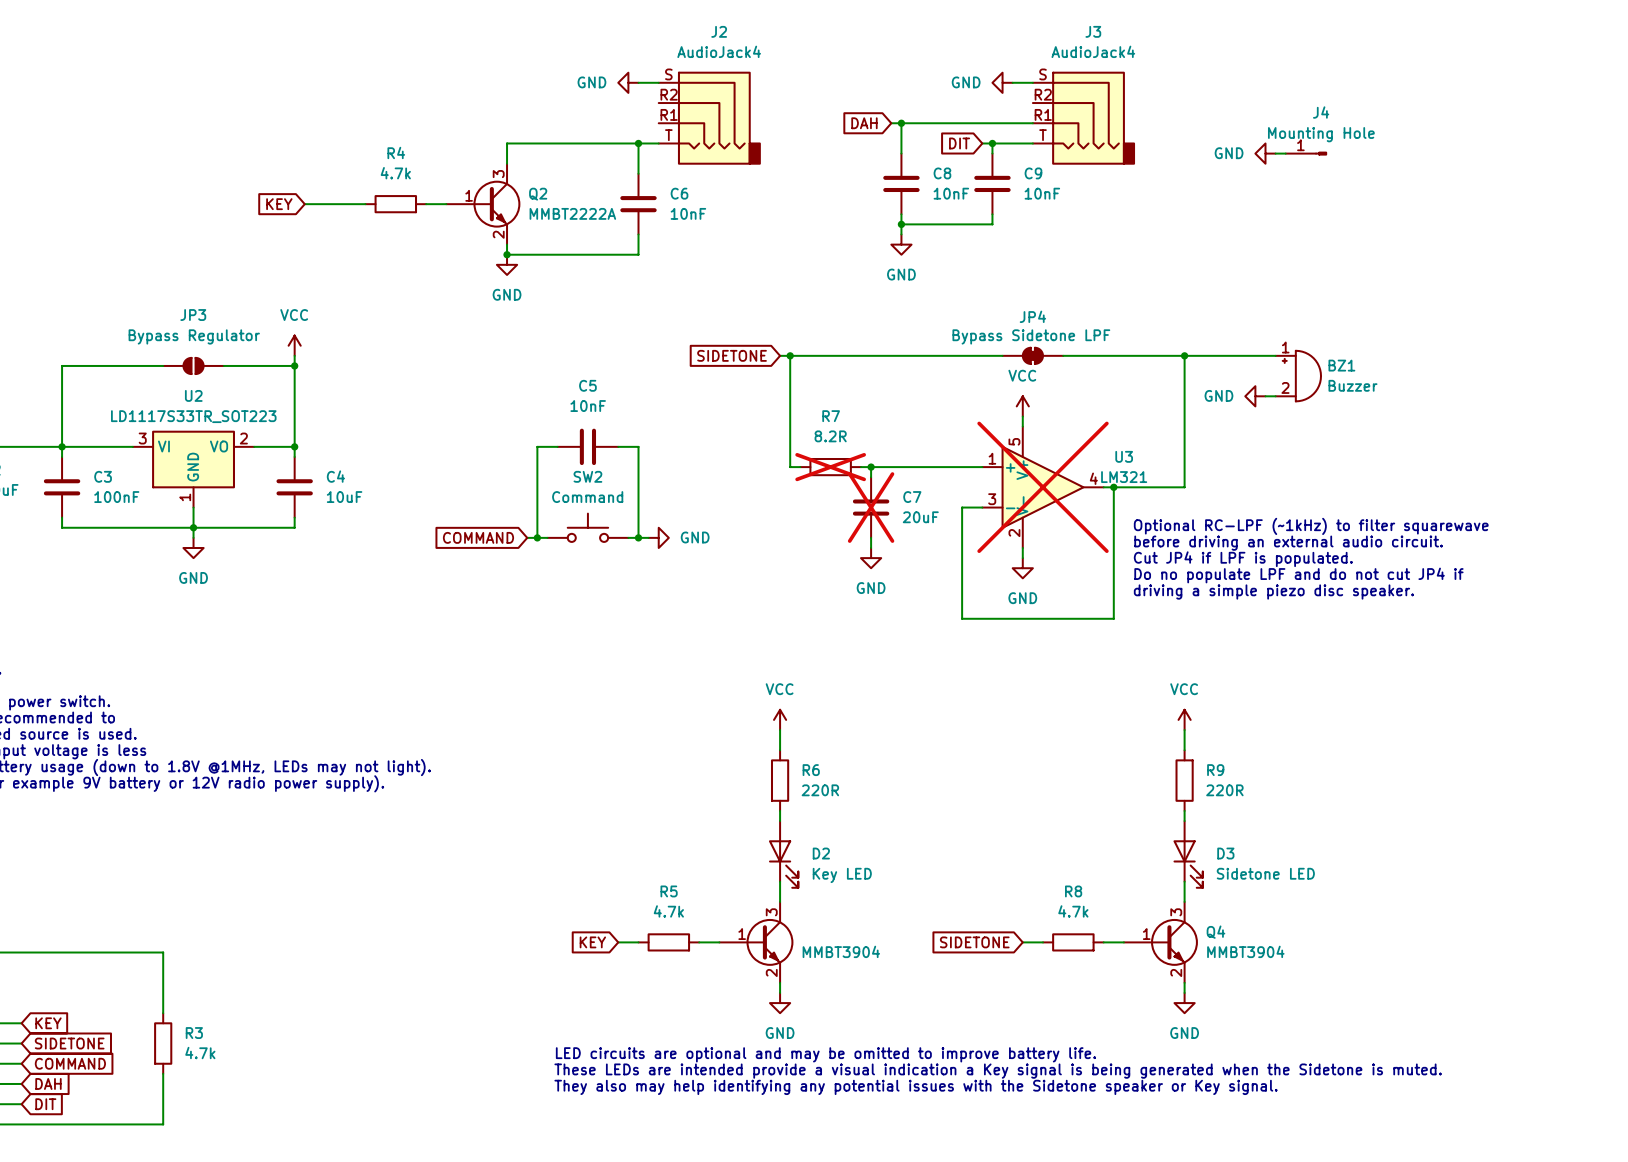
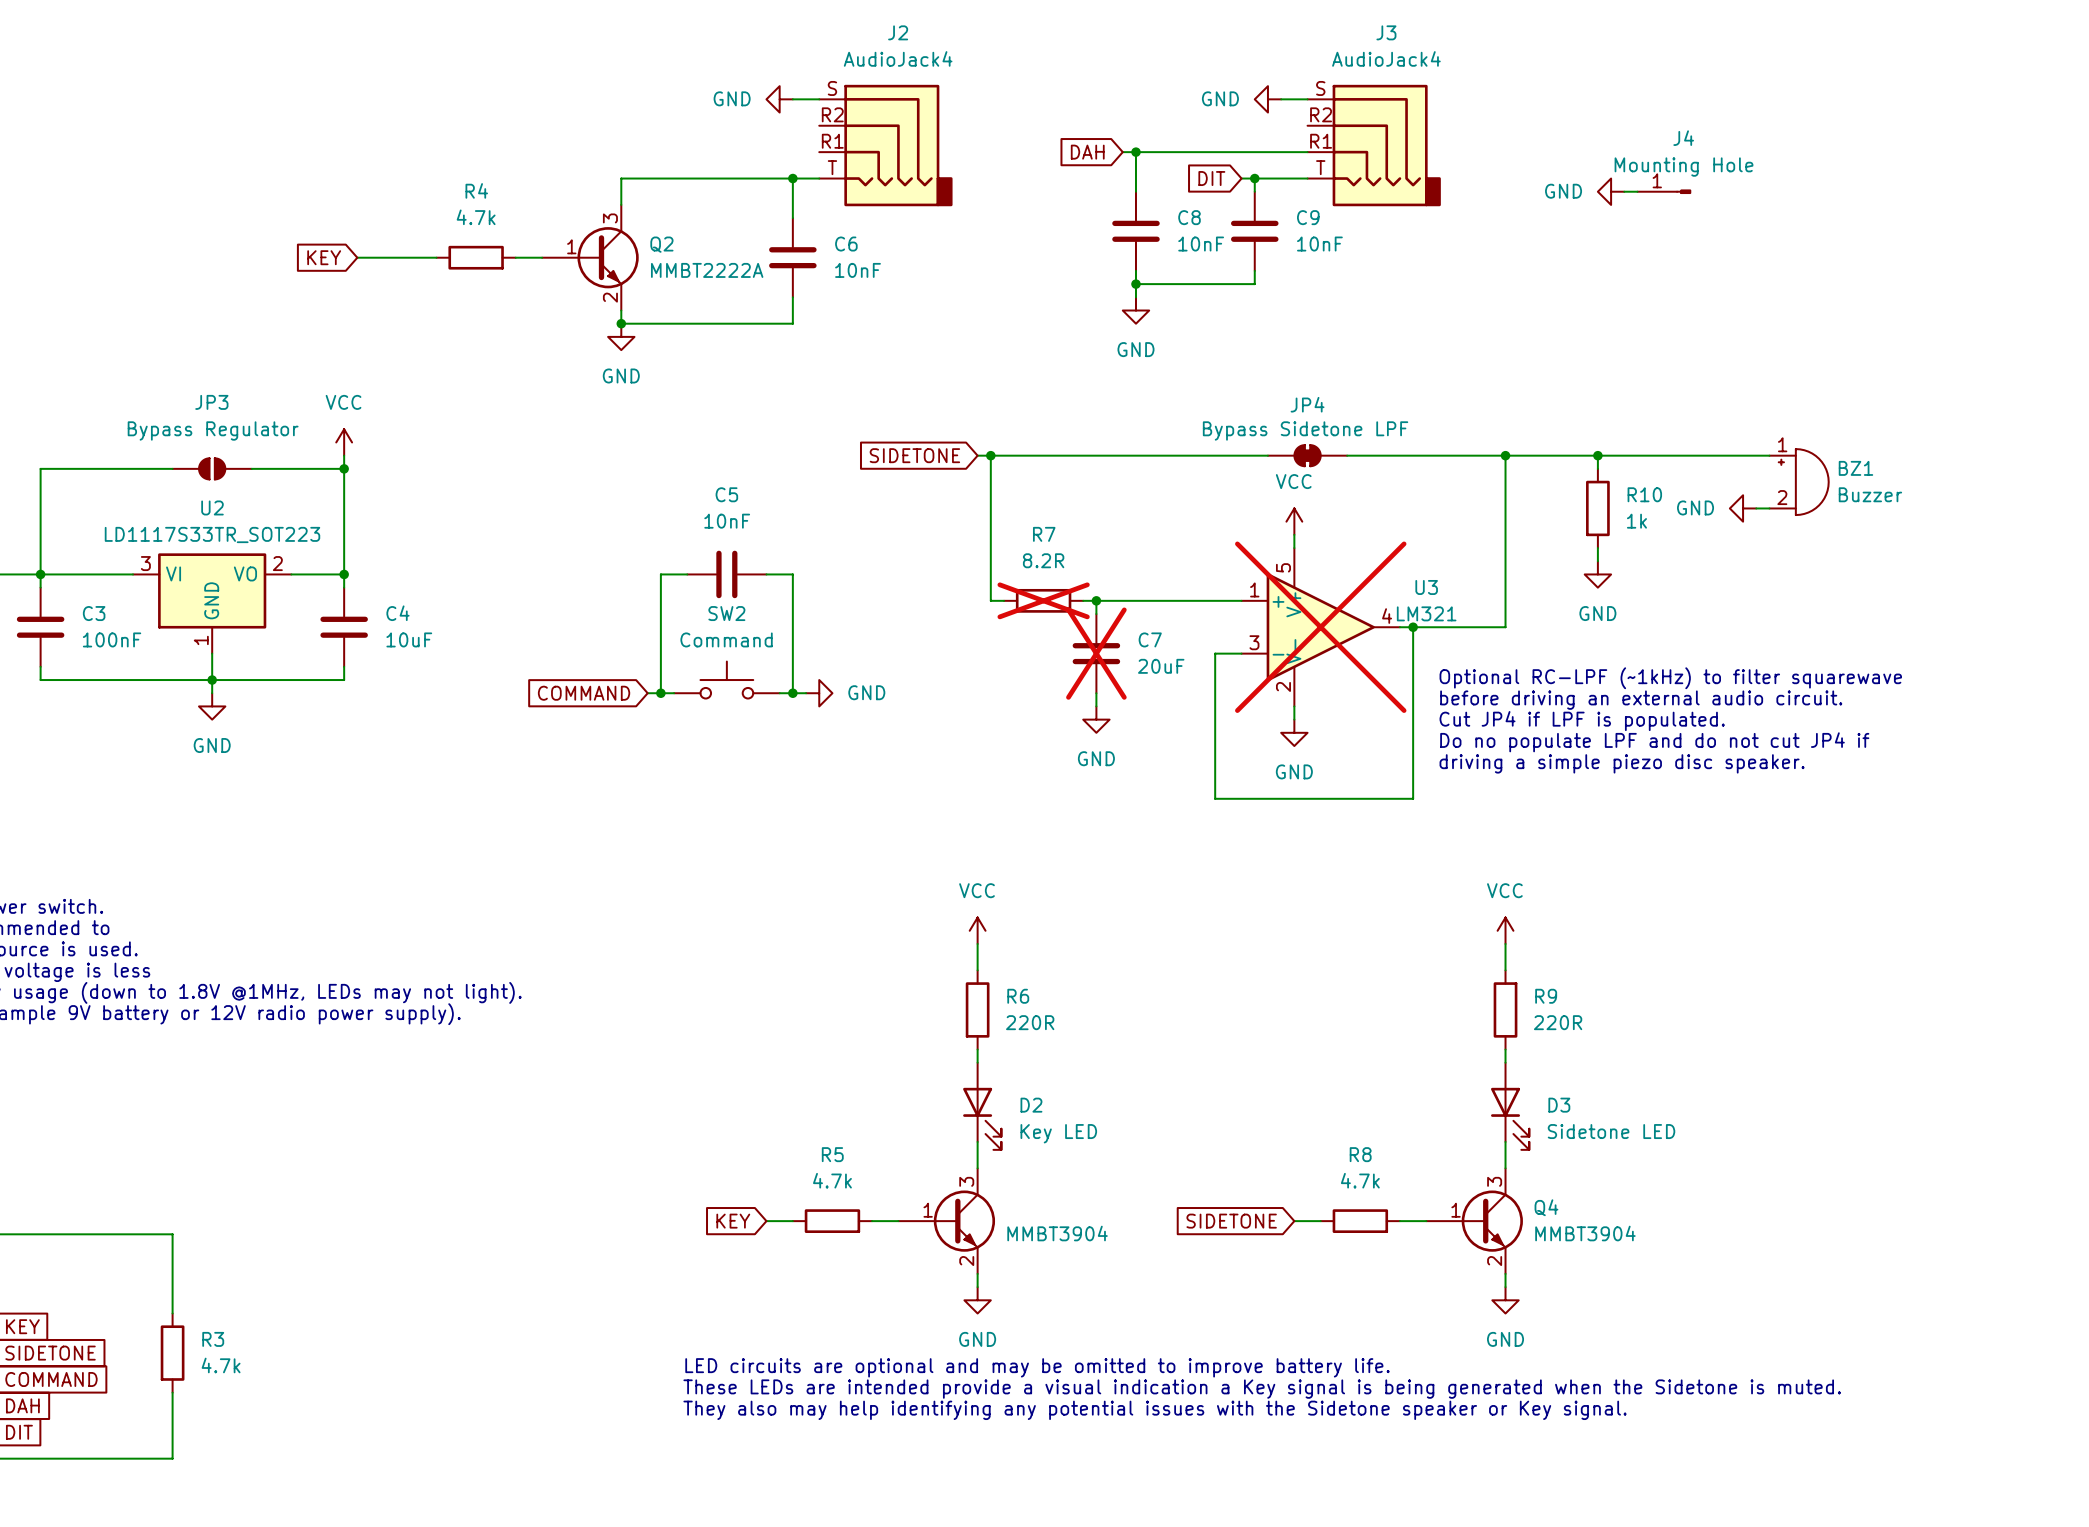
wire: none -> (1597, 455) (1597, 468)
junction: none -> (1597, 455)
wire: none -> (1624, 455) (1769, 455)
BZ1 position: (1298, 376) -> (1799, 482)
power symbol rotation: 0° (1255, 396) -> 90° counterclockwise (1597, 574)
power symbol position: GND (1255, 396) -> GND (1597, 574)
R10: none -> 1k (1597, 508)
wire: (1265, 396) (1275, 396) -> (1756, 508) (1769, 508)
power symbol: none -> GND (1743, 508)
wire: none -> (1597, 548) (1597, 561)

